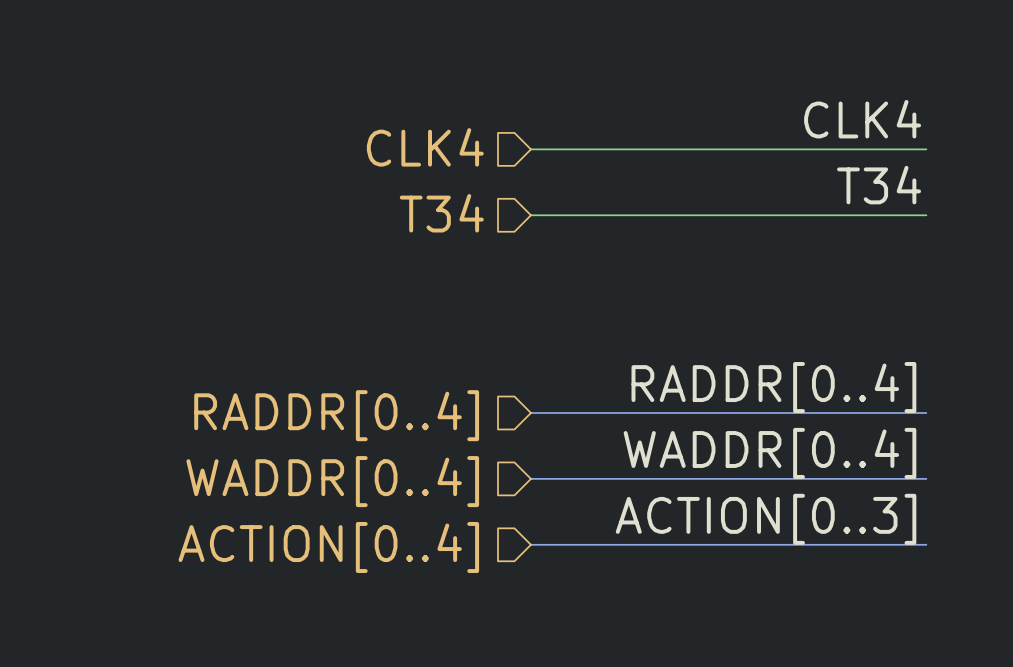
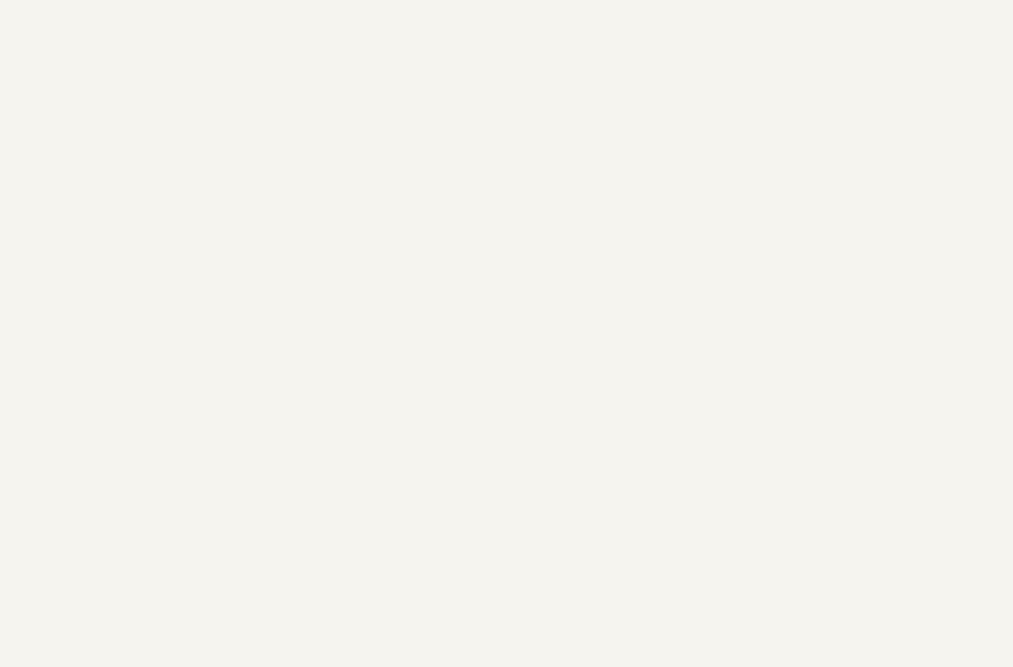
label: CLK4 (862, 119) -> none
hierarchical label: CLK4 (425, 147) -> none
wire: (530, 149) (926, 149) -> none
label: T34 (879, 185) -> none
hierarchical label: T34 (441, 213) -> none
wire: (530, 215) (926, 215) -> none
label: RADDR[0..4] (773, 387) -> none
bus: (530, 412) (926, 412) -> none
hierarchical label: RADDR[0..4] (336, 415) -> none
label: WADDR[0..4] (770, 453) -> none
bus: (530, 478) (926, 478) -> none
hierarchical label: WADDR[0..4] (332, 481) -> none
label: ACTION[0..3] (766, 519) -> none
bus: (530, 544) (926, 544) -> none
hierarchical label: ACTION[0..4] (328, 547) -> none

